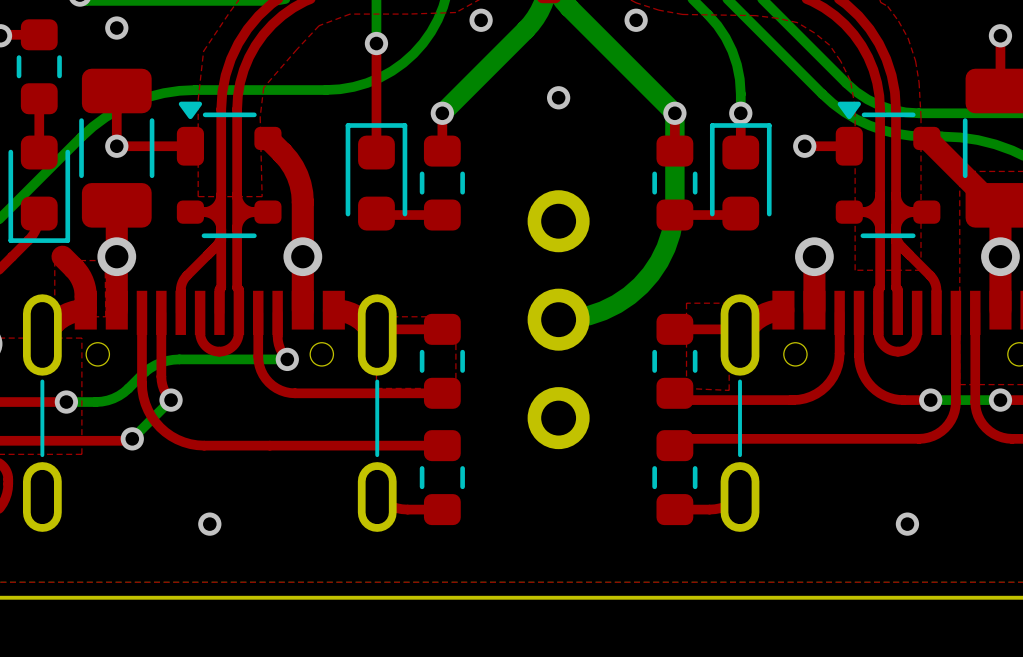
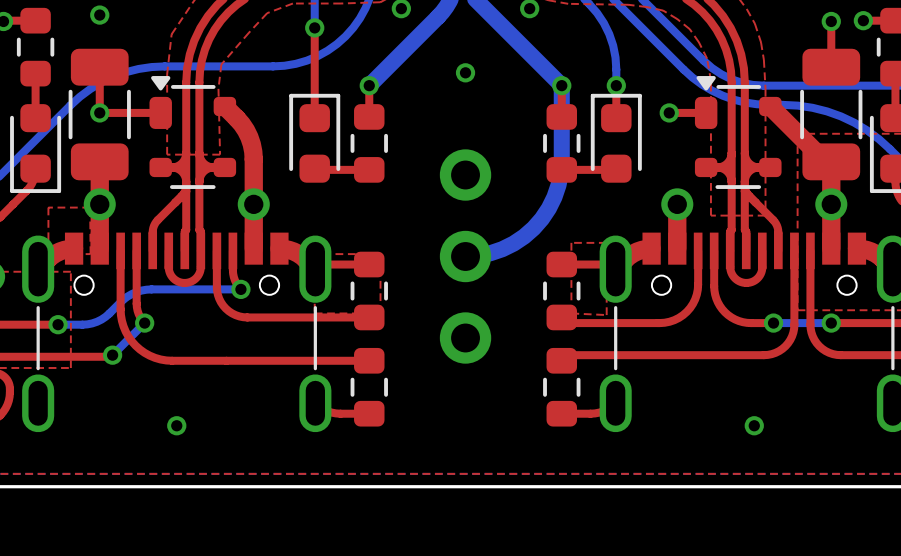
top track: (62, 256) (76, 271) (82, 281) (85, 292) (85, 310) -> none

